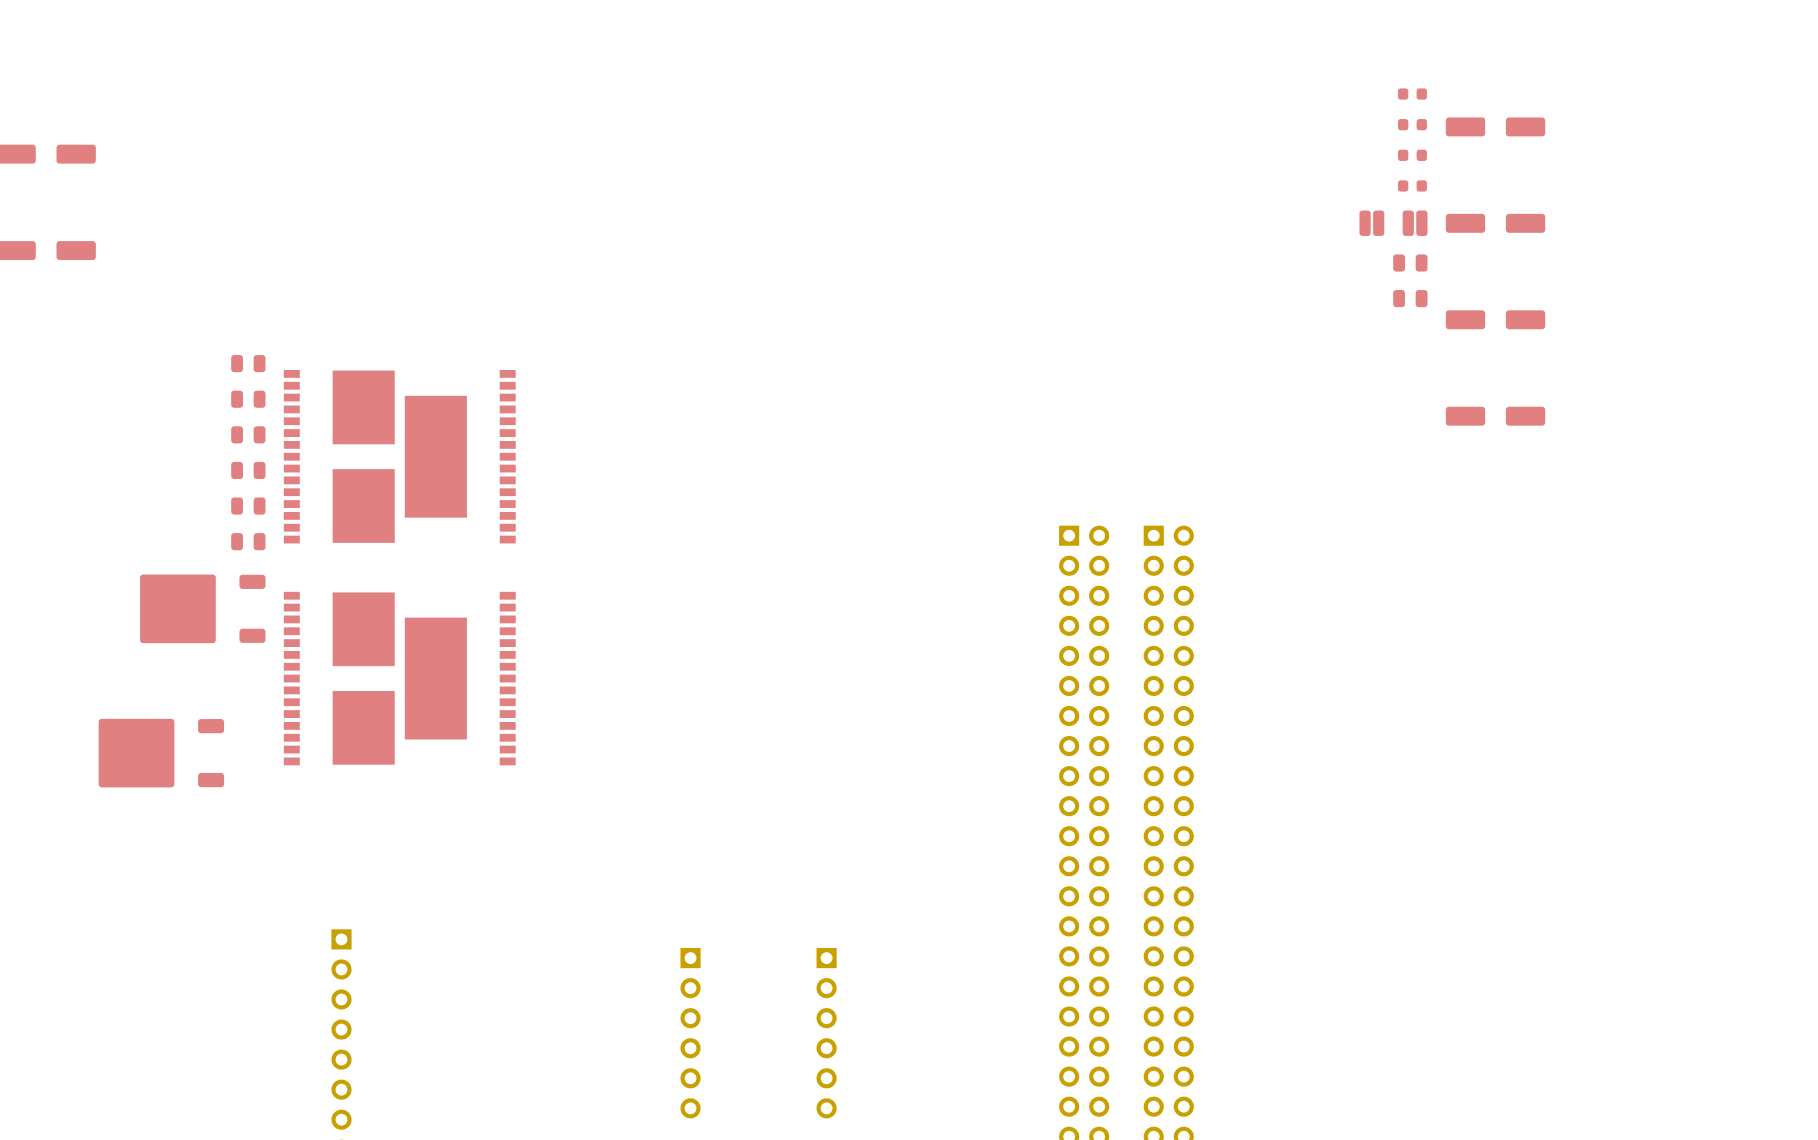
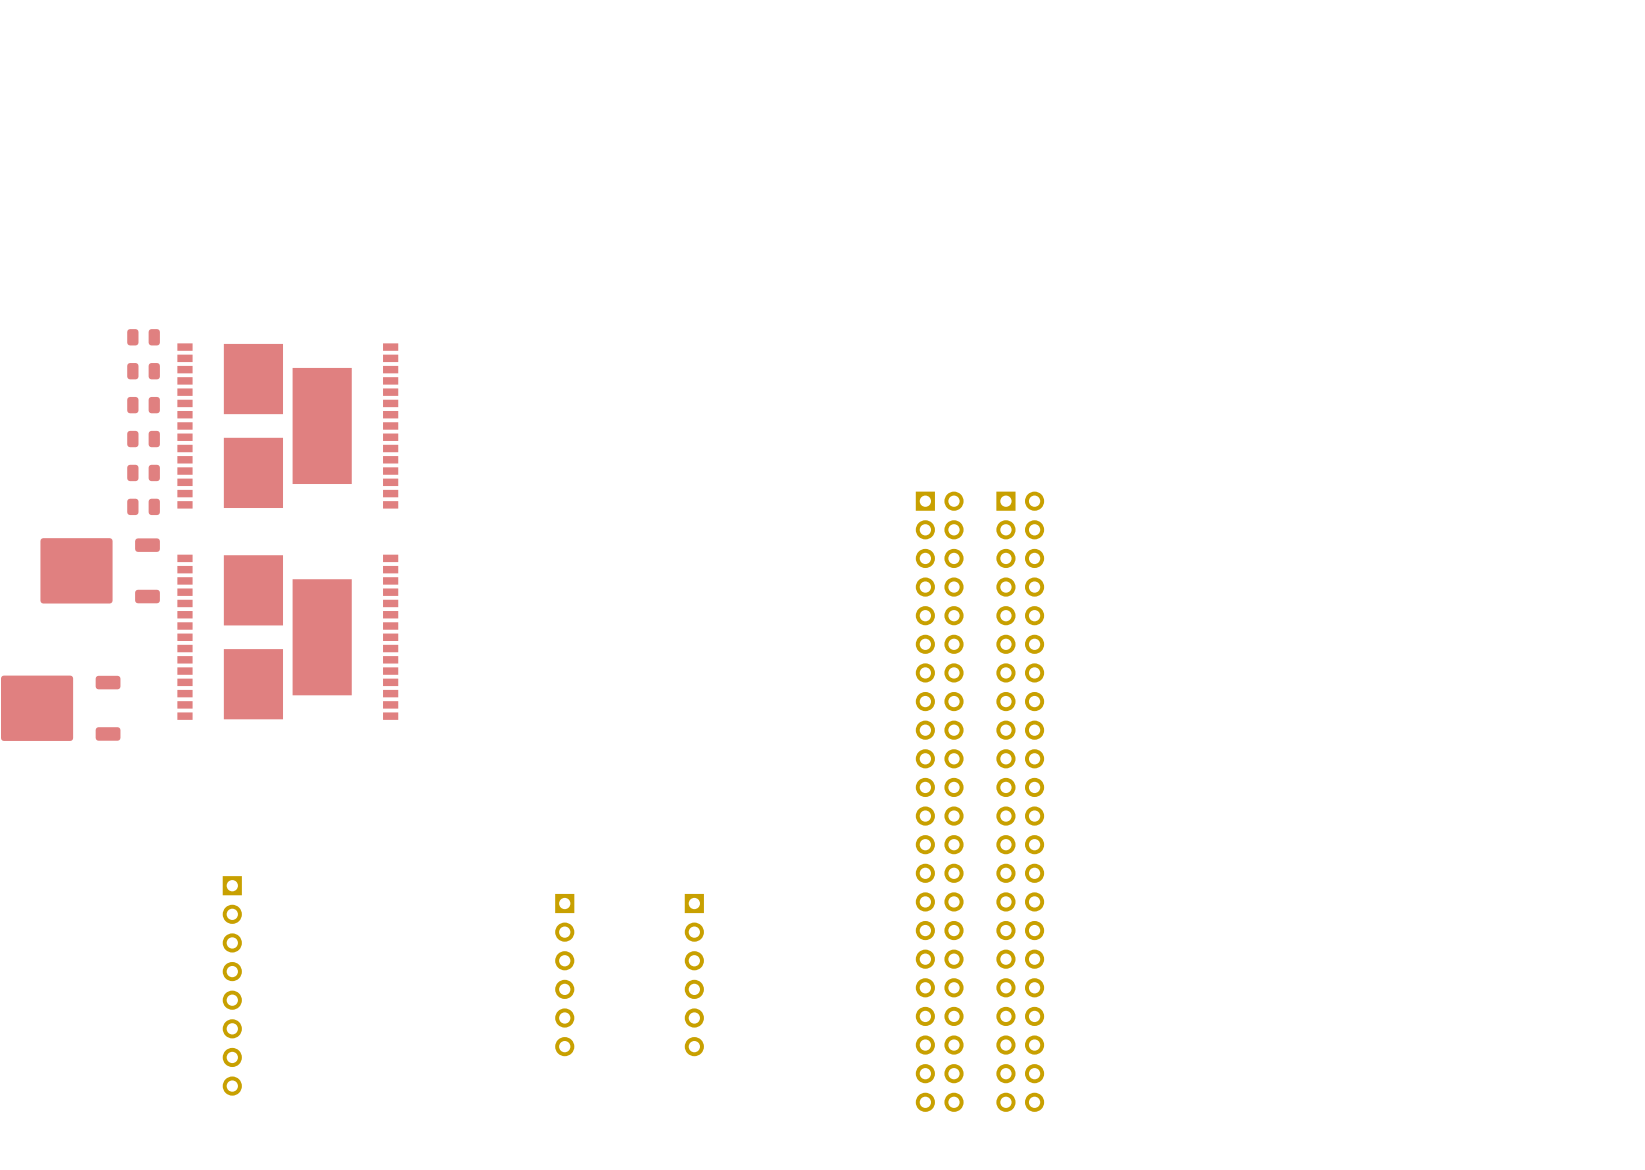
part: (1412, 94) -> none
part: (1412, 124) -> none
part: (1495, 126) -> none
part: (1412, 155) -> none
part: (1412, 185) -> none
part: (1371, 223) -> none
part: (1415, 223) -> none
part: (1495, 223) -> none
part: (1410, 262) -> none
part: (1410, 298) -> none
part: (1495, 319) -> none
part: (1495, 416) -> none

